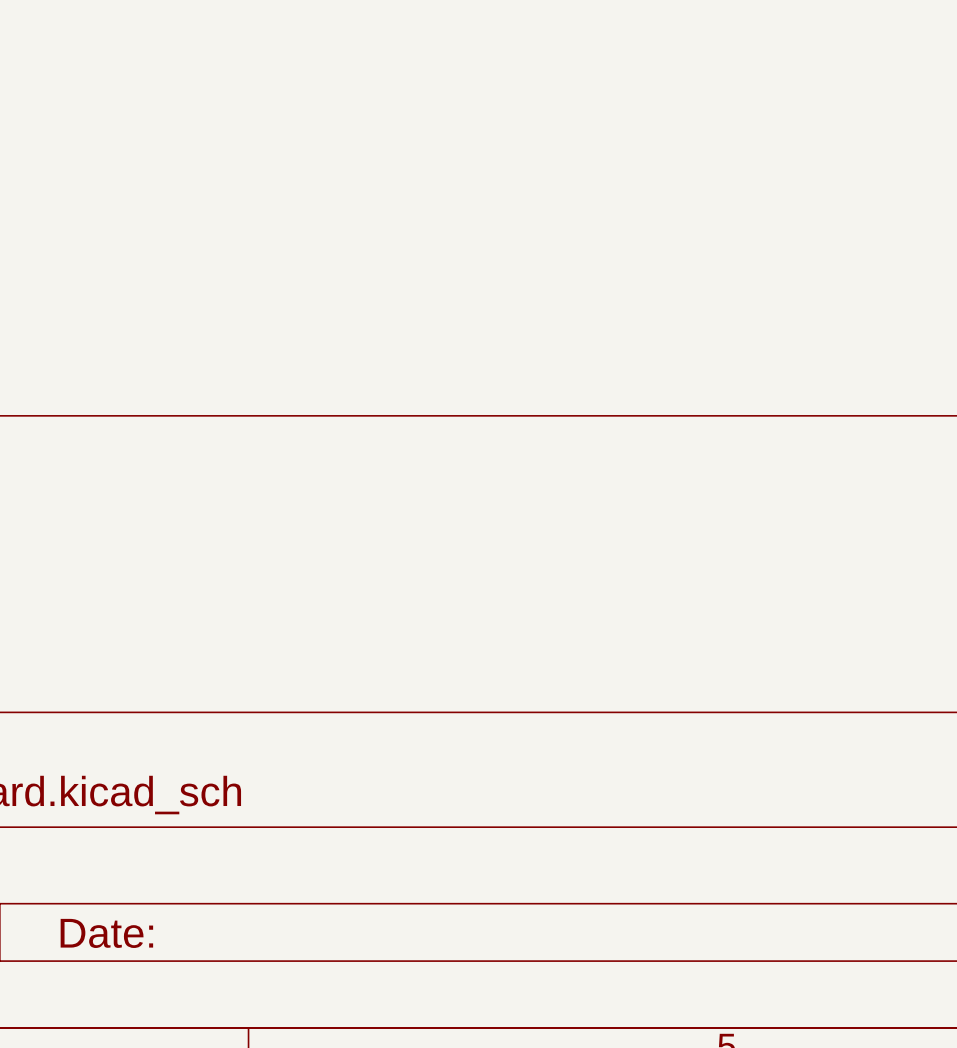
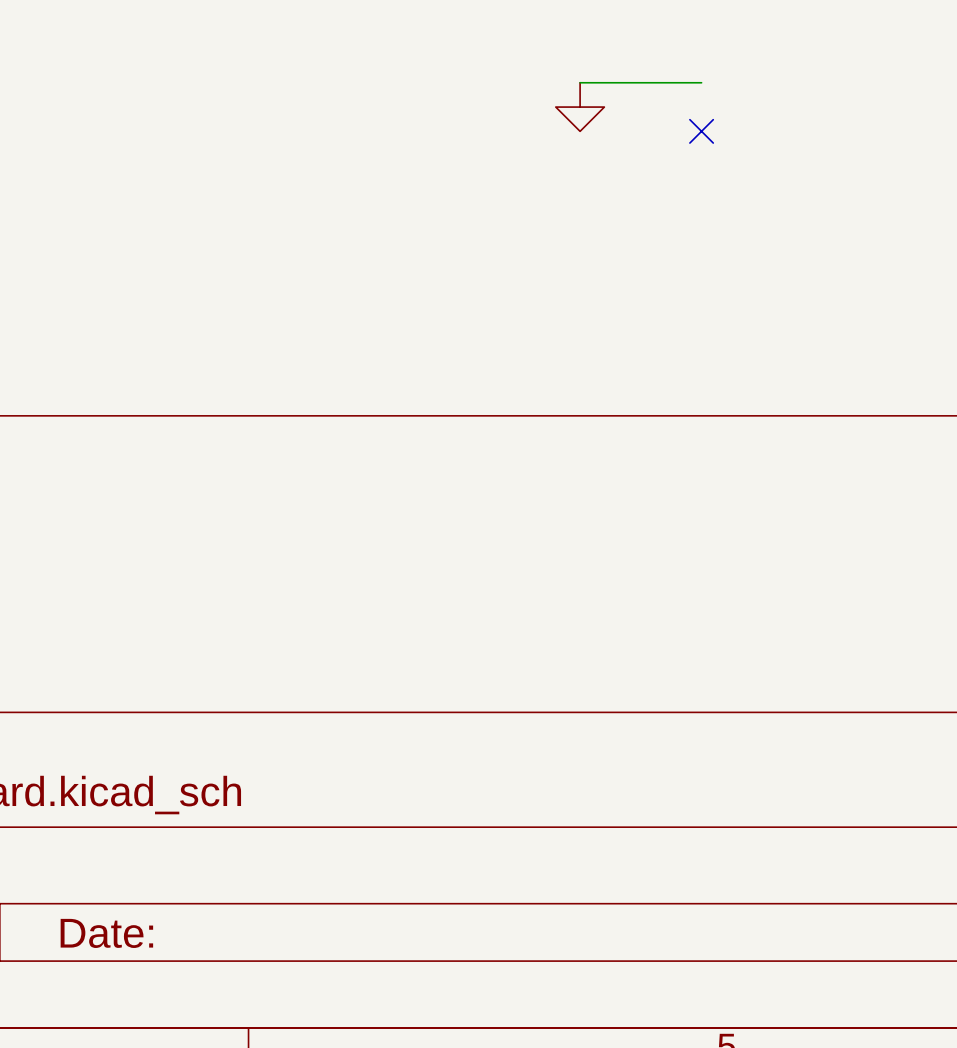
wire: none -> (580, 82) (701, 82)
power symbol: none -> (580, 107)
no-connect mark: none -> (701, 131)

